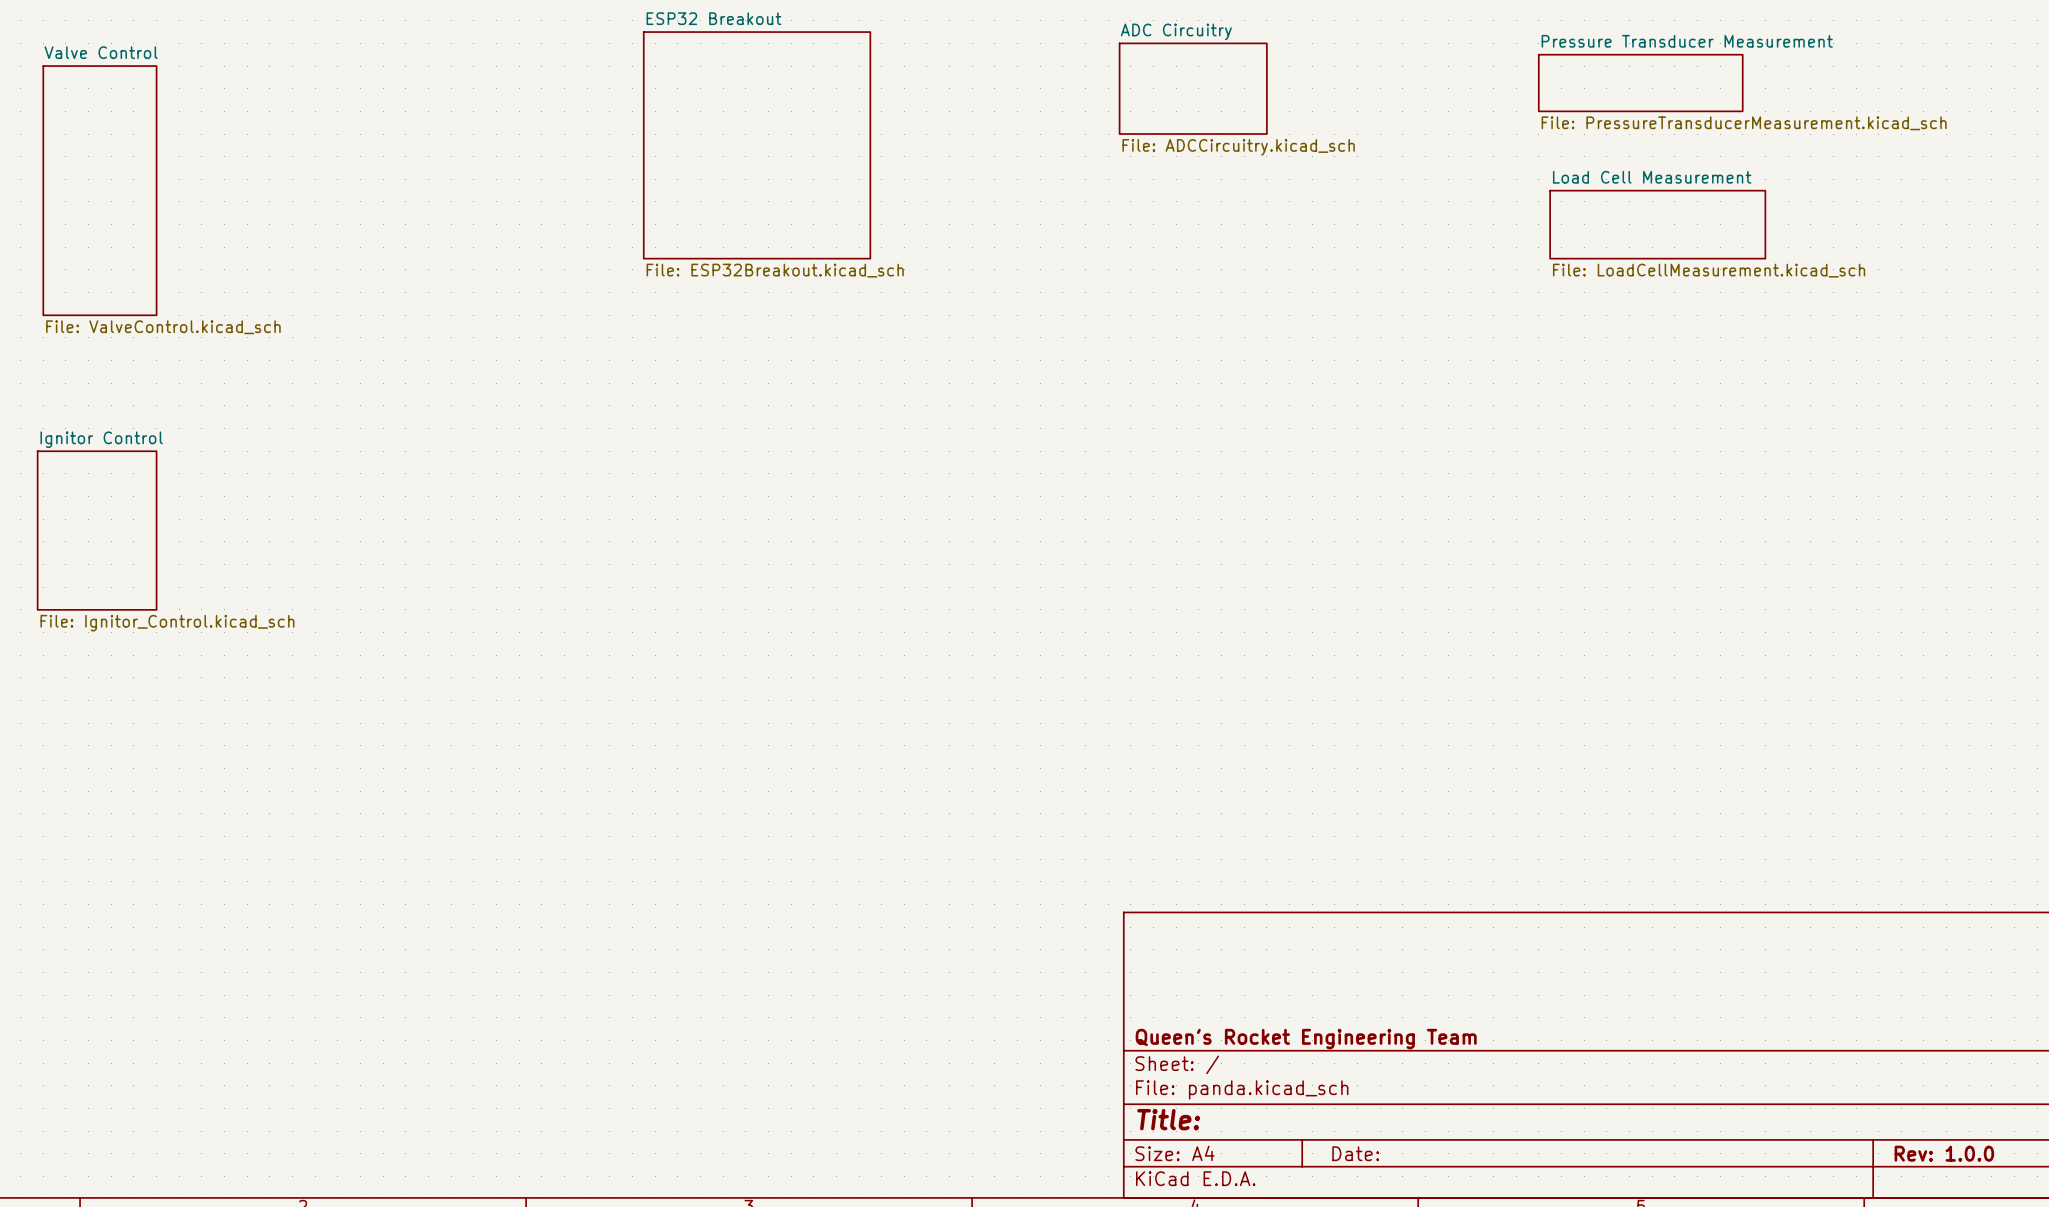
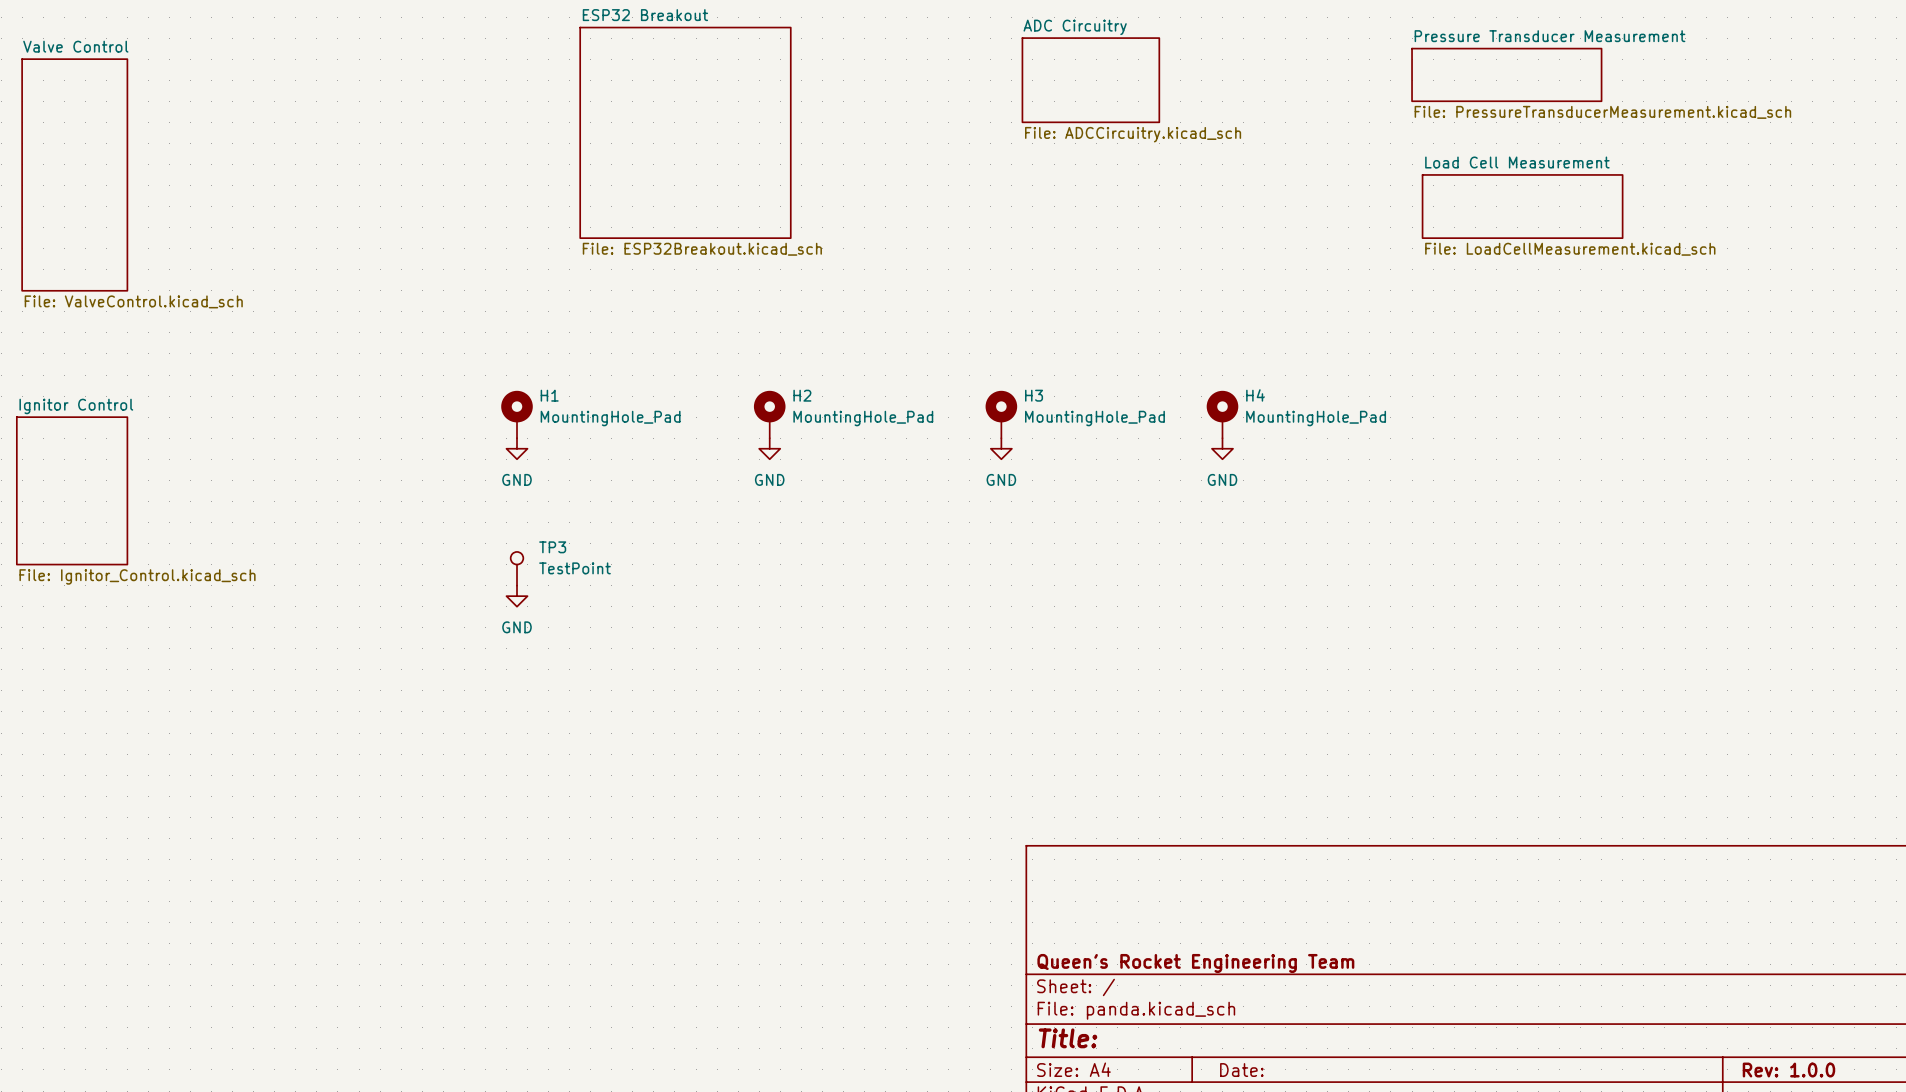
H1: none -> MountingHole_Pad (517, 414)
H2: none -> MountingHole_Pad (769, 414)
H3: none -> MountingHole_Pad (1001, 414)
H4: none -> MountingHole_Pad (1222, 414)
power symbol: none -> GND (517, 448)
power symbol: none -> GND (769, 448)
power symbol: none -> GND (1001, 448)
power symbol: none -> GND (1222, 448)
TP3: none -> TestPoint (517, 568)
power symbol: none -> GND (517, 596)

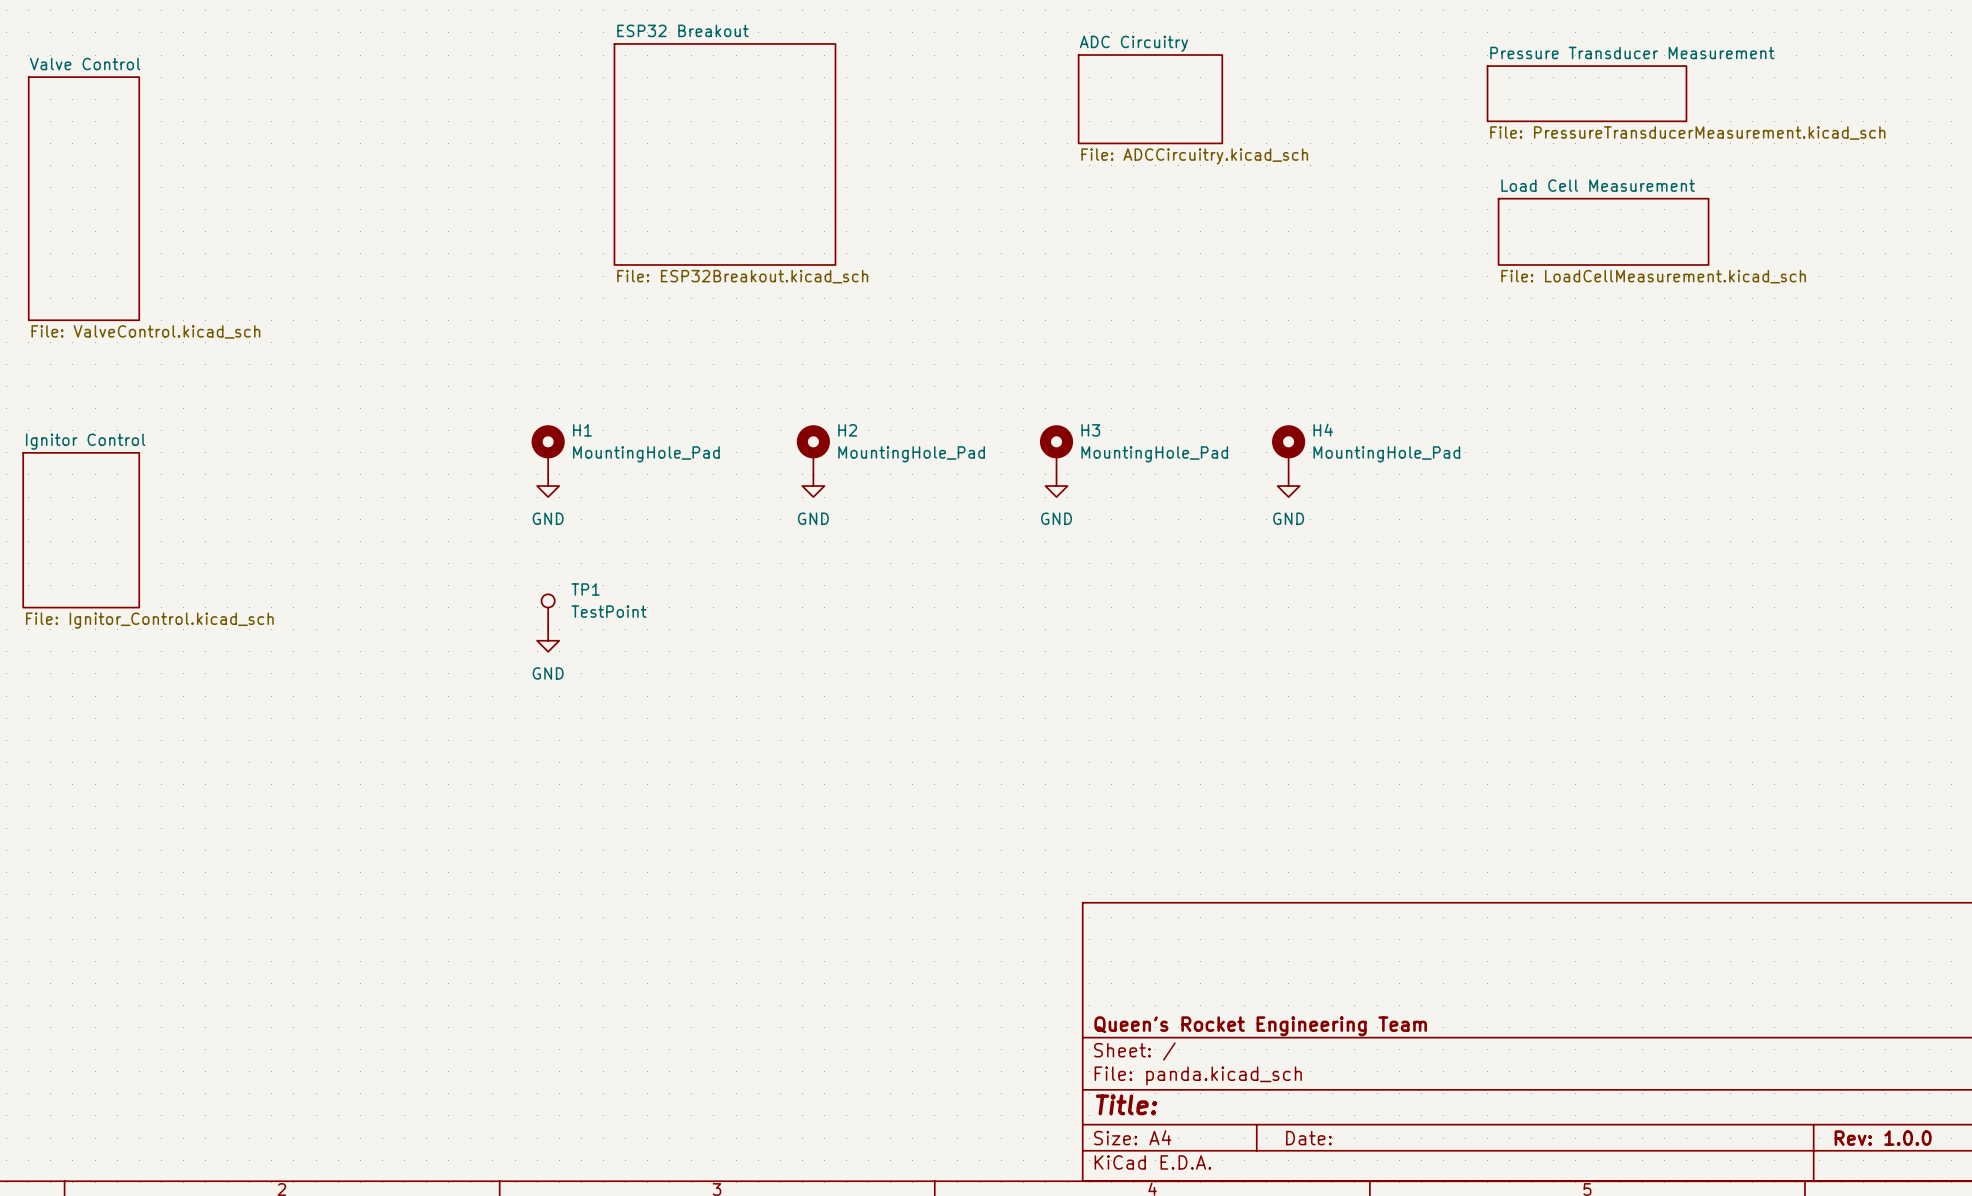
TP3 name: TP3 (552, 547) -> TP1 (585, 589)

